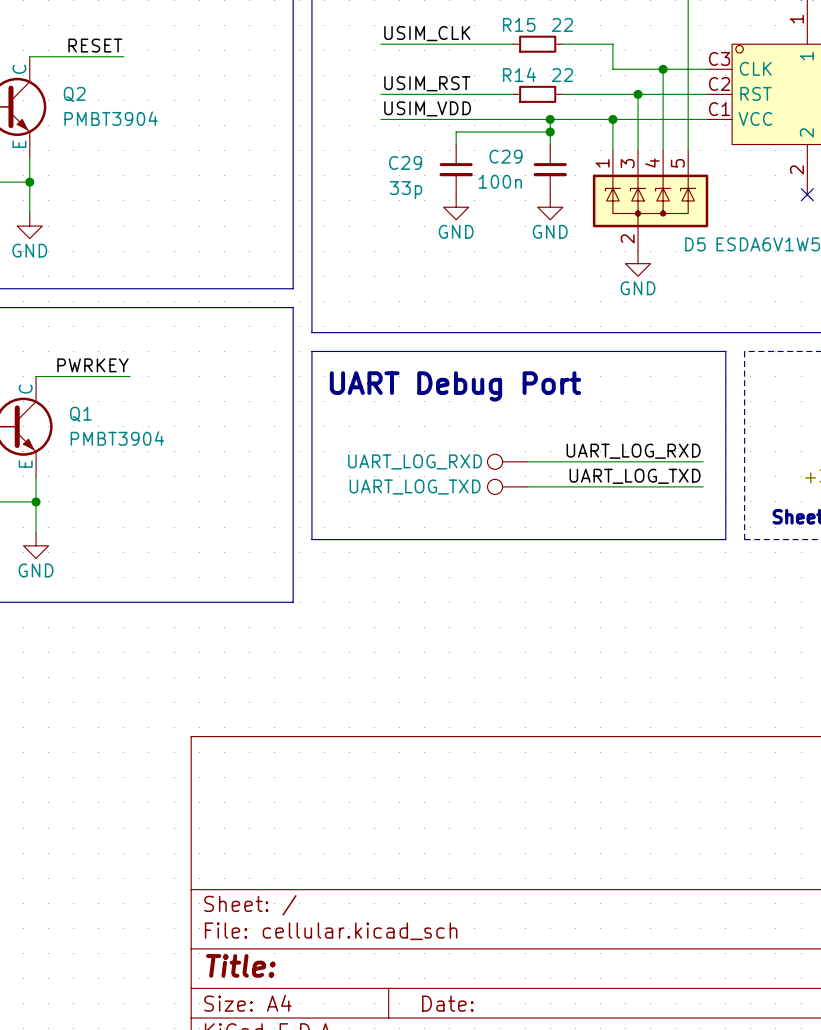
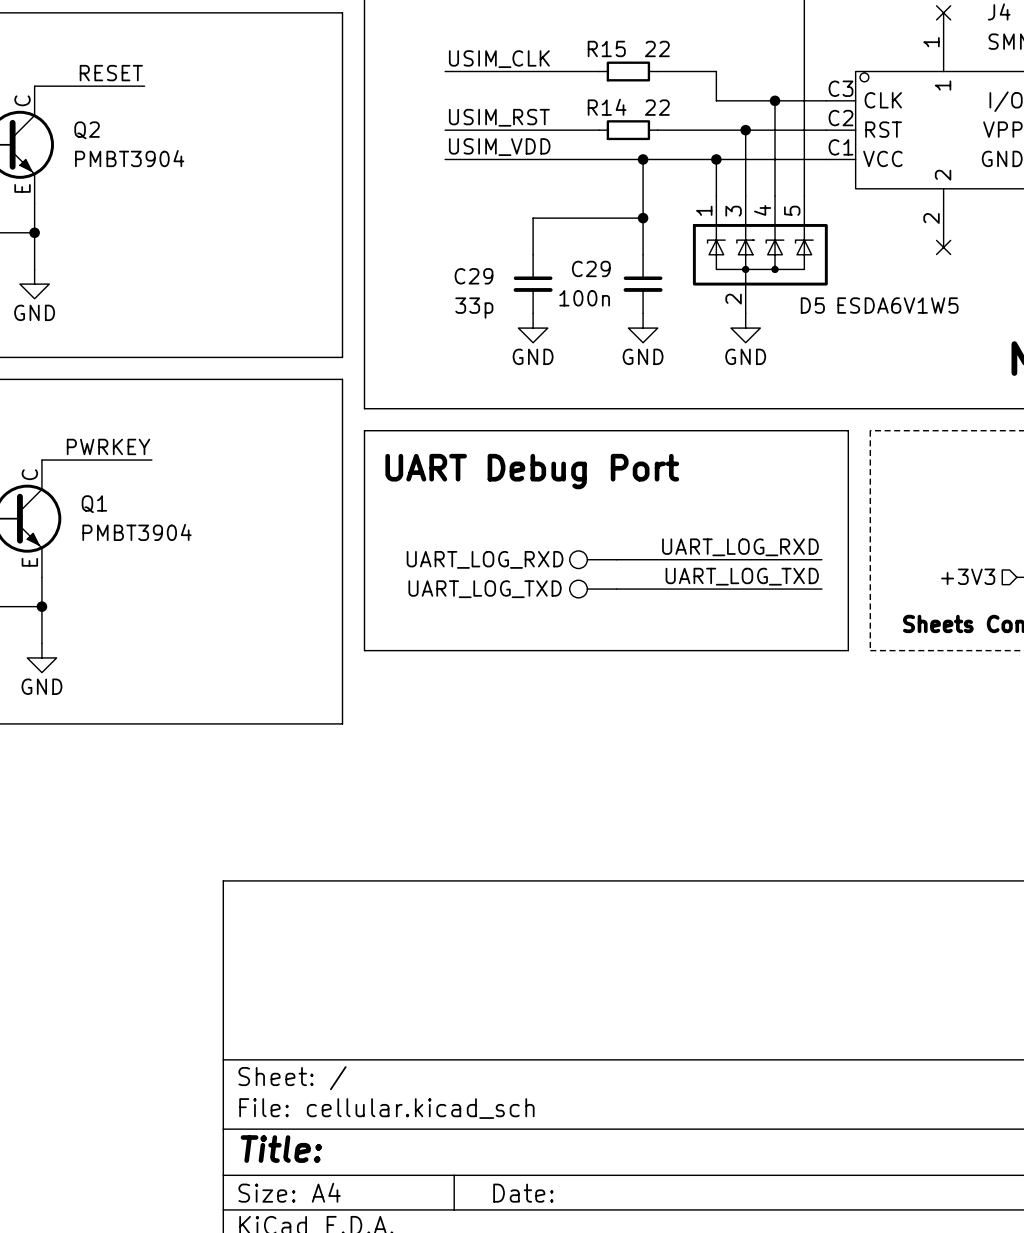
wire: (550, 131) (456, 131) (456, 144) -> none
junction position: (550, 131) -> (643, 218)
C29 position: (456, 169) -> (533, 284)
wire: none -> (643, 218) (533, 218) (533, 254)
C29 position: (550, 169) -> (643, 284)
power symbol: GND (456, 207) -> none
power symbol: GND (550, 207) -> none
power symbol: none -> GND (533, 328)
power symbol: none -> GND (643, 328)

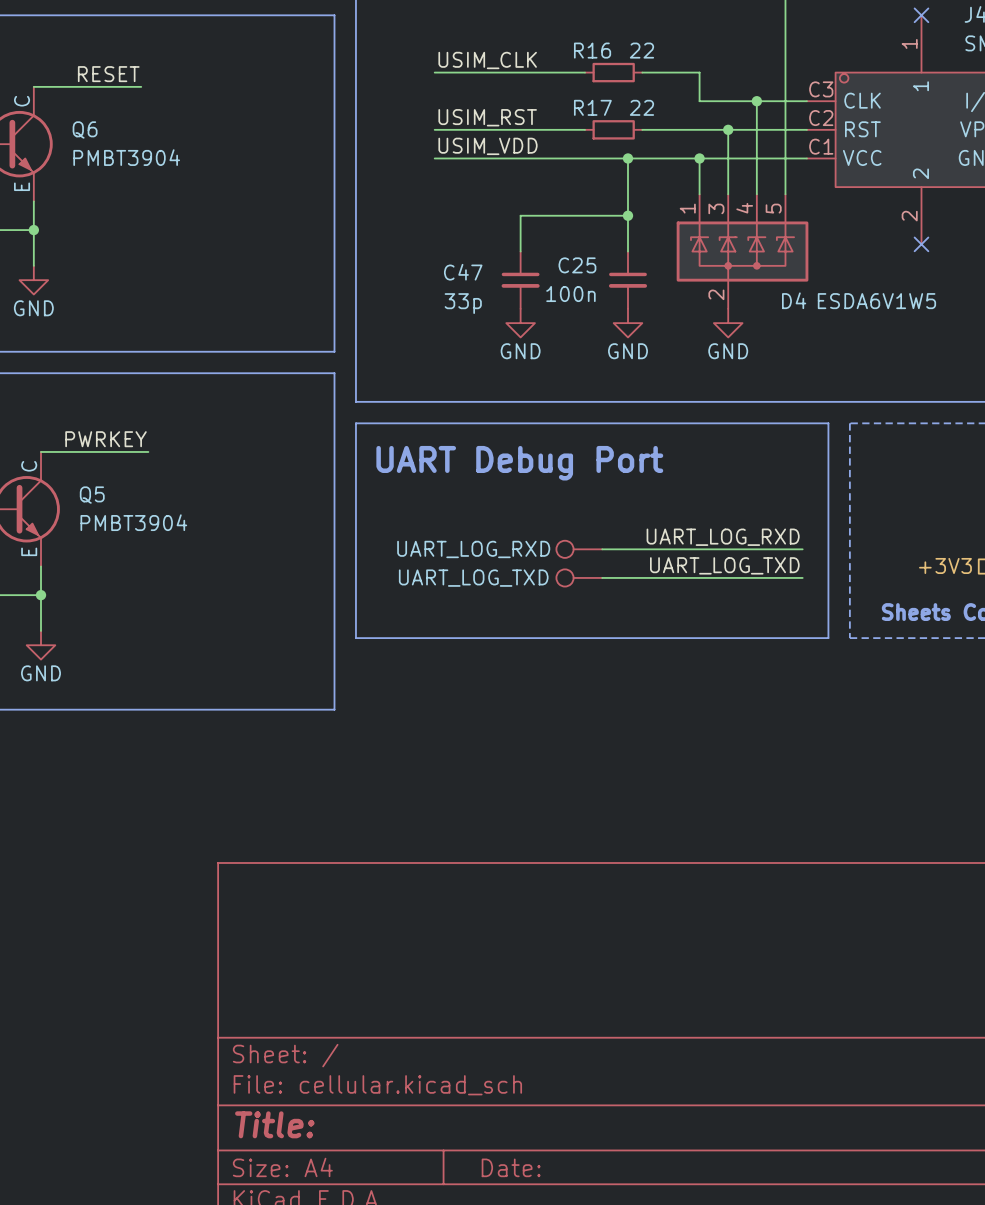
R15 name: R15 (606, 48) -> R16 (592, 50)
R14 name: R14 (607, 107) -> R17 (592, 107)
Q2 name: Q2 (87, 130) -> Q6 (85, 129)
C29 name: C29 (591, 268) -> C25 (577, 265)
C29 name: C29 (473, 276) -> C47 (463, 272)
D5 name: D5 (812, 305) -> D4 (794, 300)
Q1 name: Q1 (94, 504) -> Q5 (92, 495)

